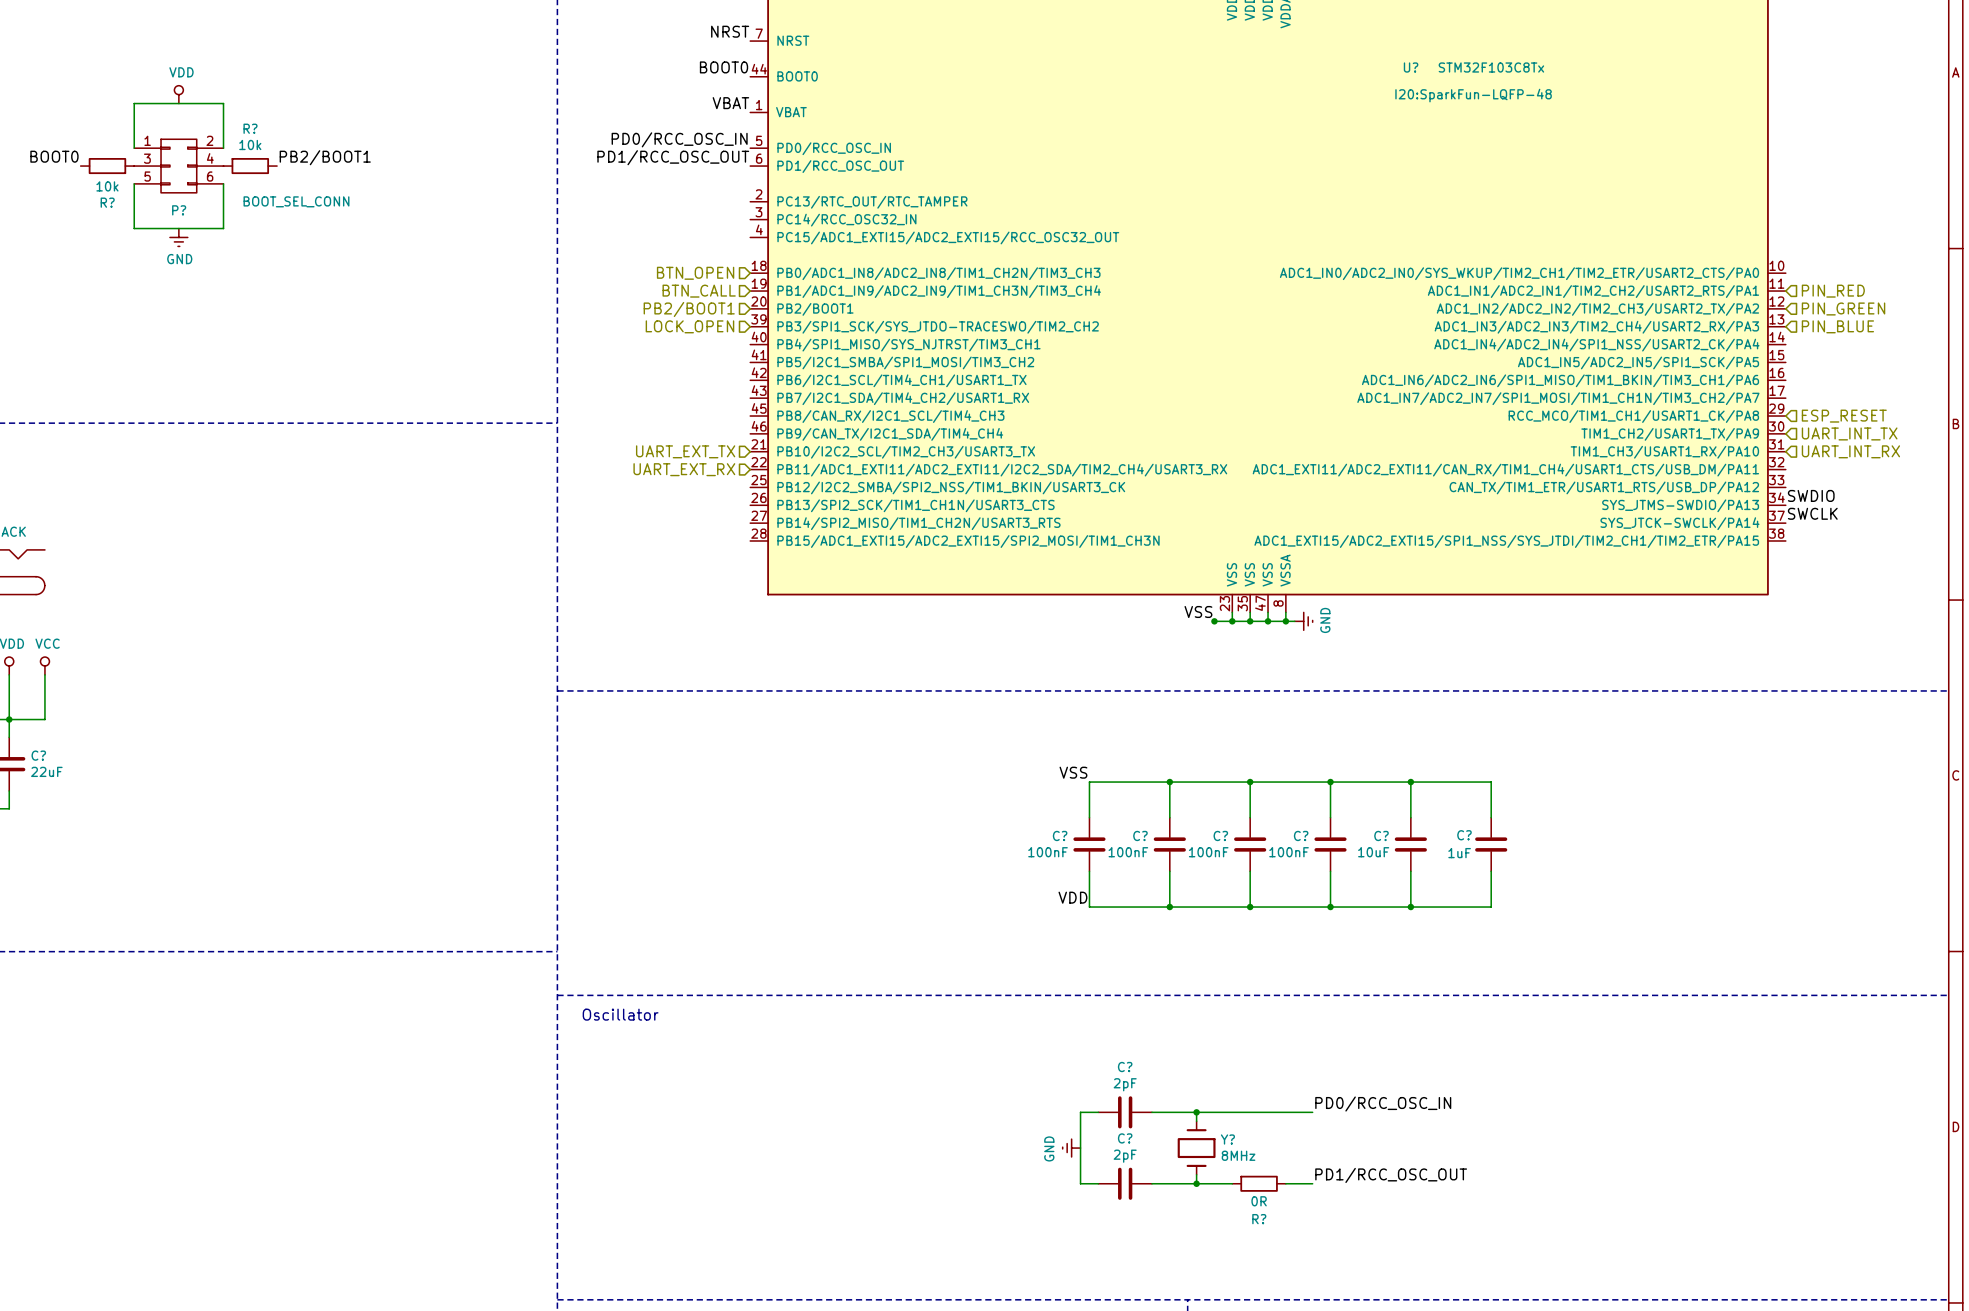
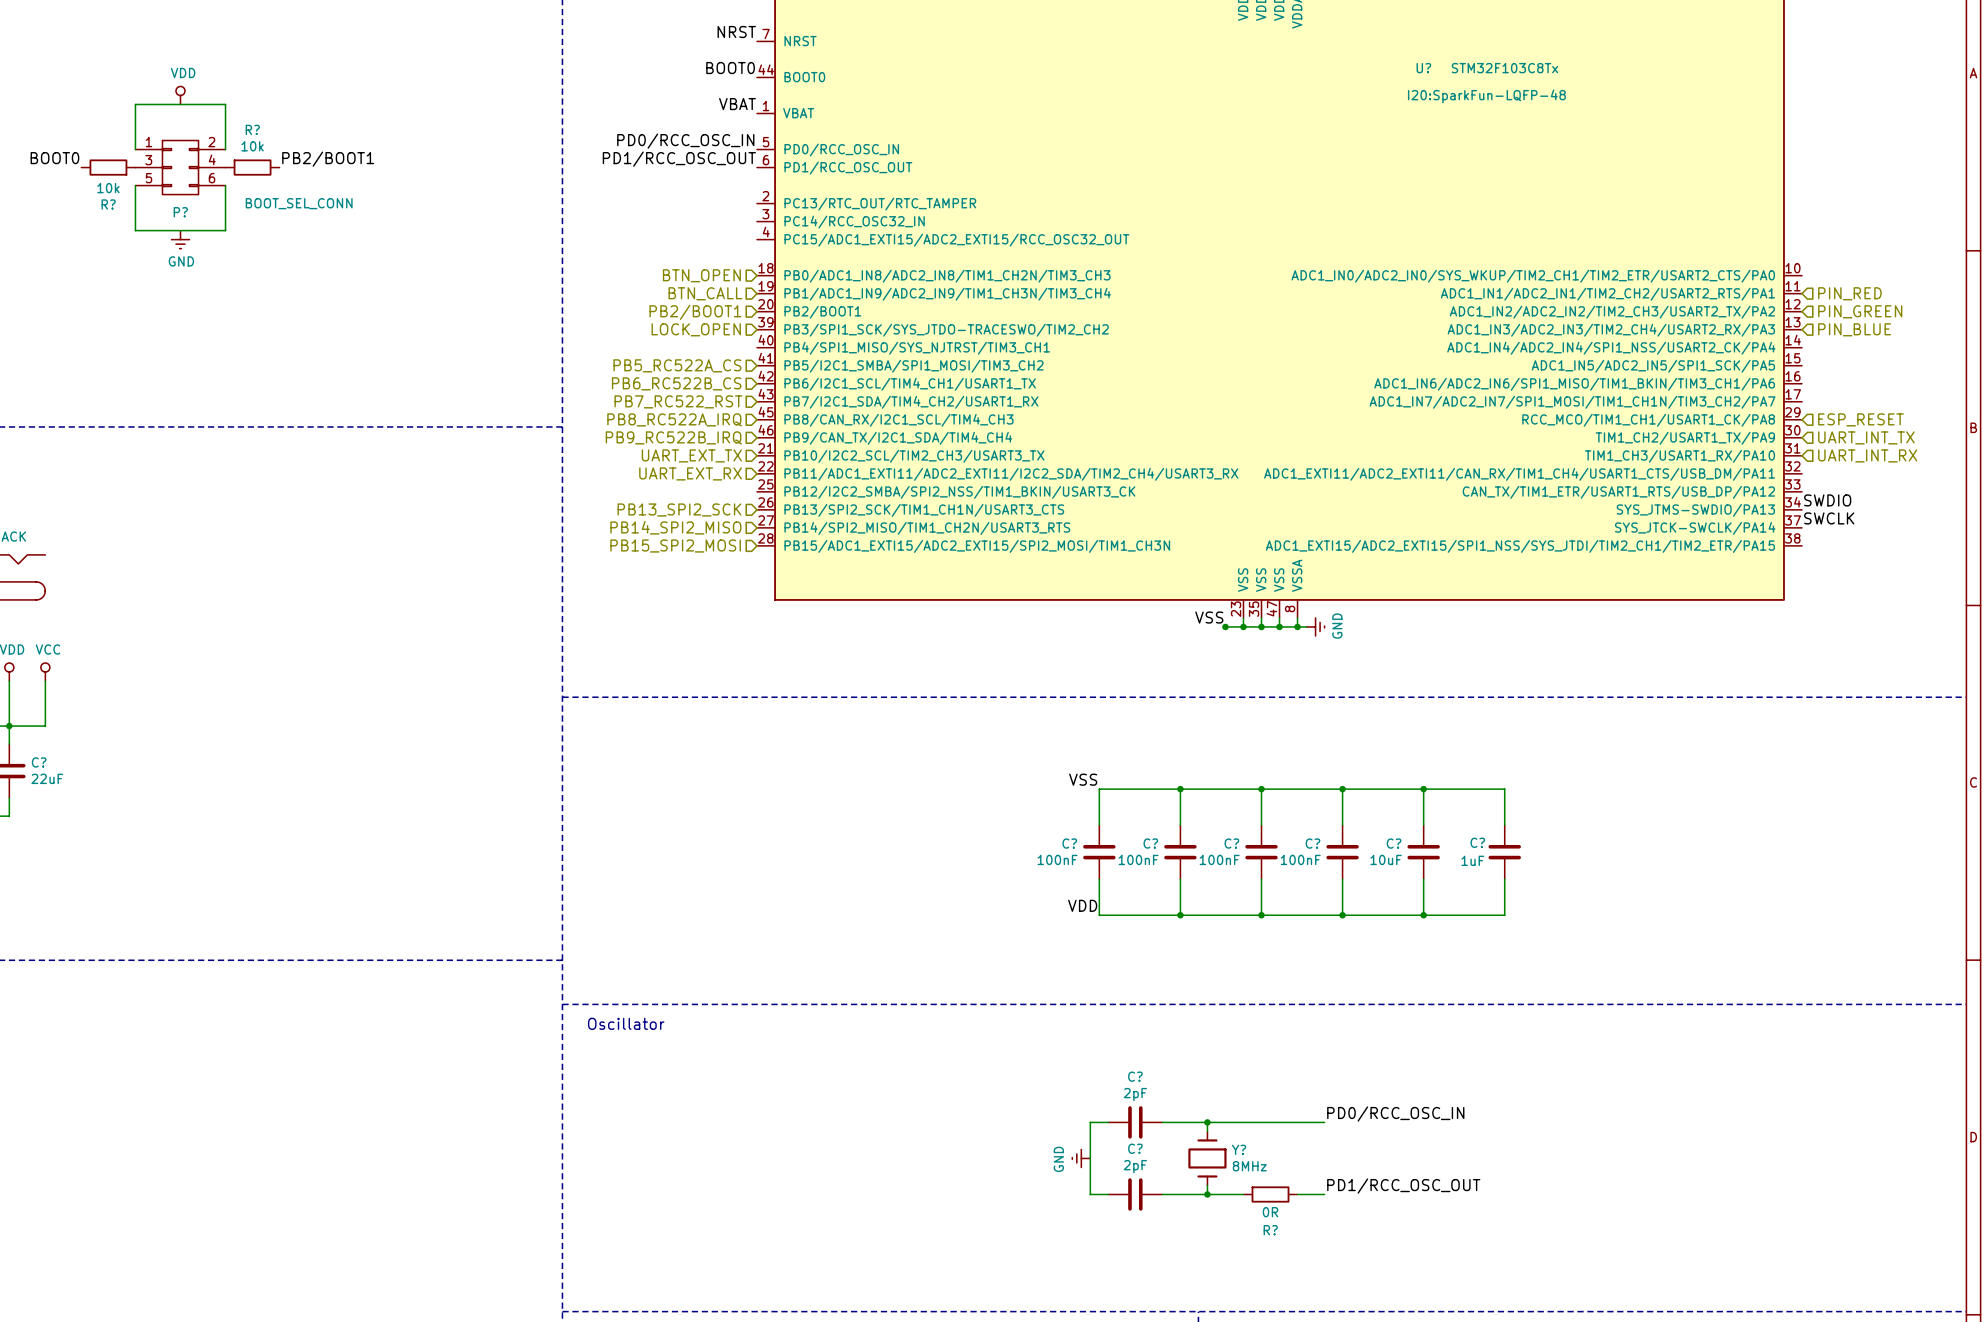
hierarchical label: none -> PB5_RC522A_CS (677, 365)
hierarchical label: none -> PB6_RC522B_CS (676, 383)
hierarchical label: none -> PB7_RC522_RST (678, 401)
hierarchical label: none -> PB8_RC522A_IRQ (674, 419)
hierarchical label: none -> PB9_RC522B_IRQ (673, 437)
hierarchical label: none -> PB13_SPI2_SCK (679, 509)
hierarchical label: none -> PB14_SPI2_MISO (675, 527)
hierarchical label: none -> PB15_SPI2_MOSI (675, 546)

